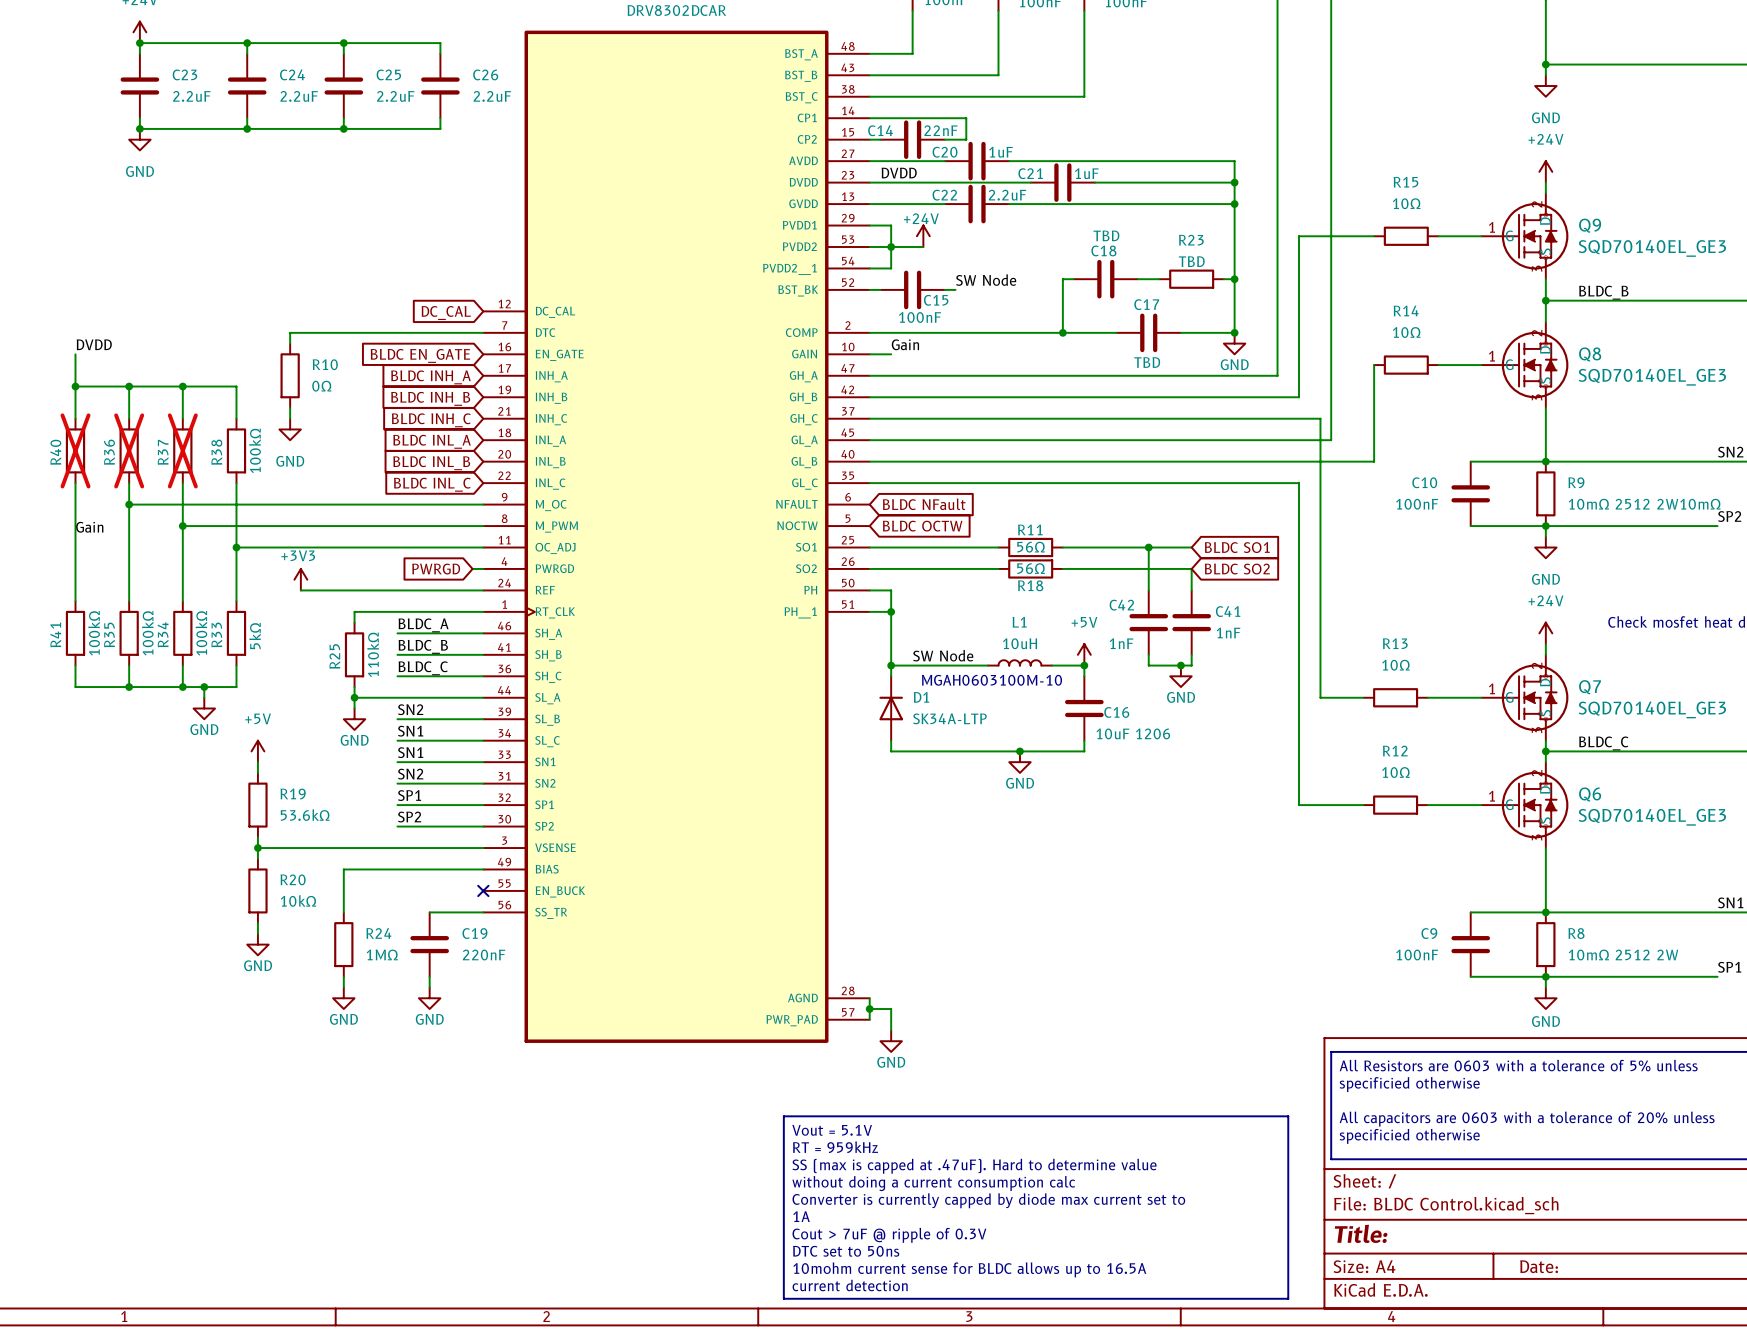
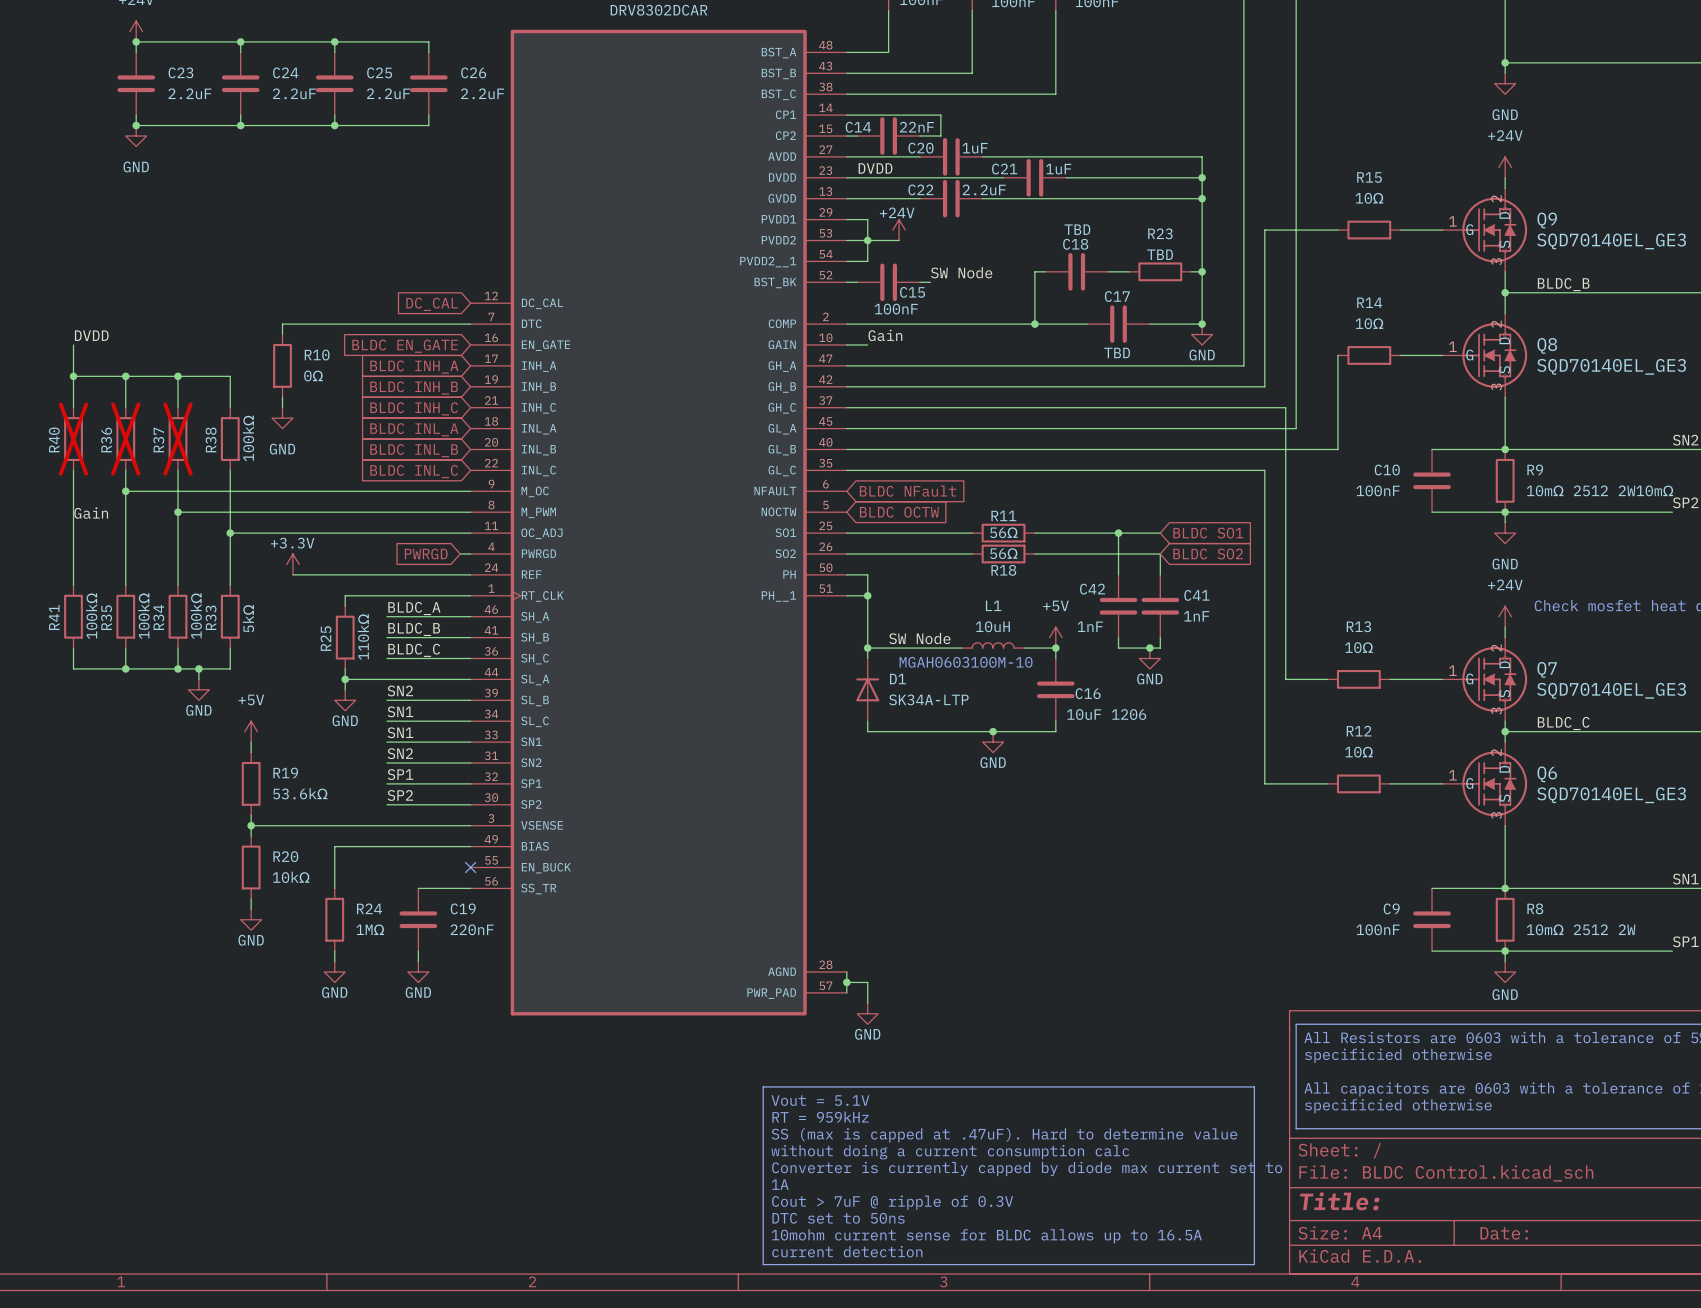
power symbol: +3V3 (300, 579) -> +3.3V (292, 564)

